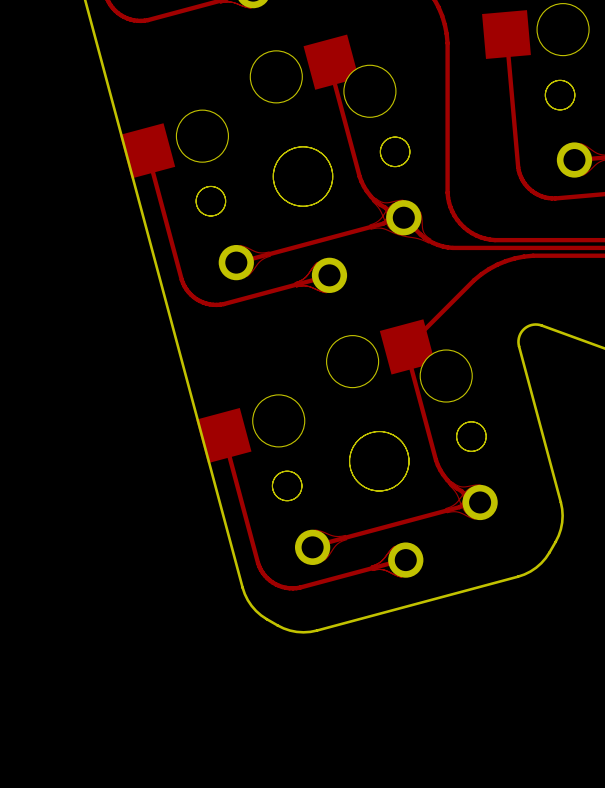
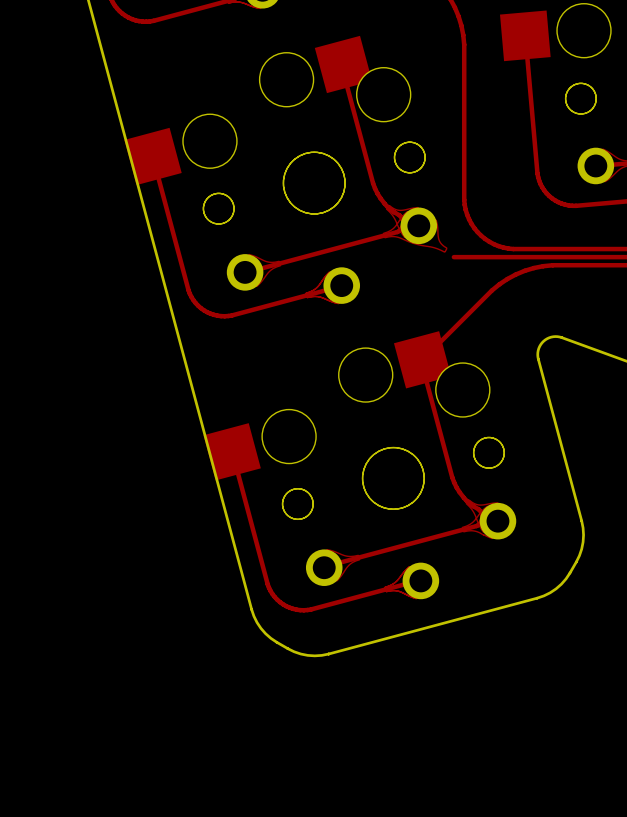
track: (403, 217) (428, 240) (452, 247) -> (453, 257) (469, 257)

